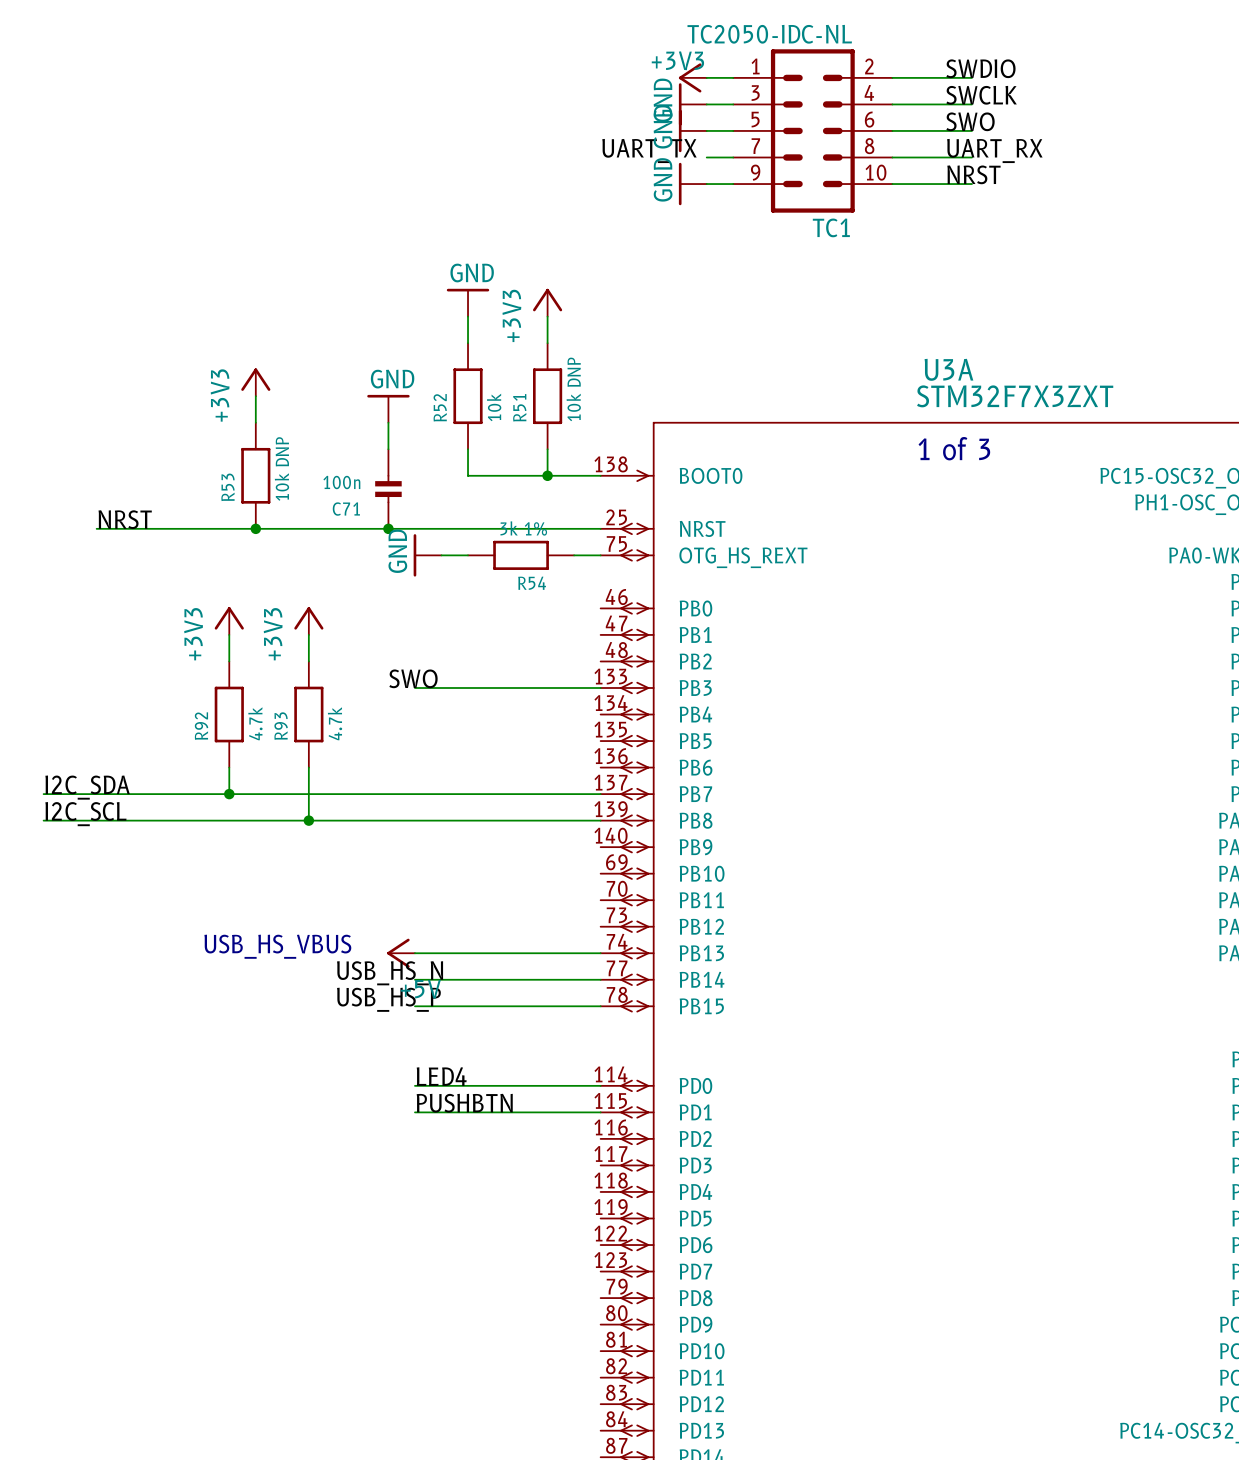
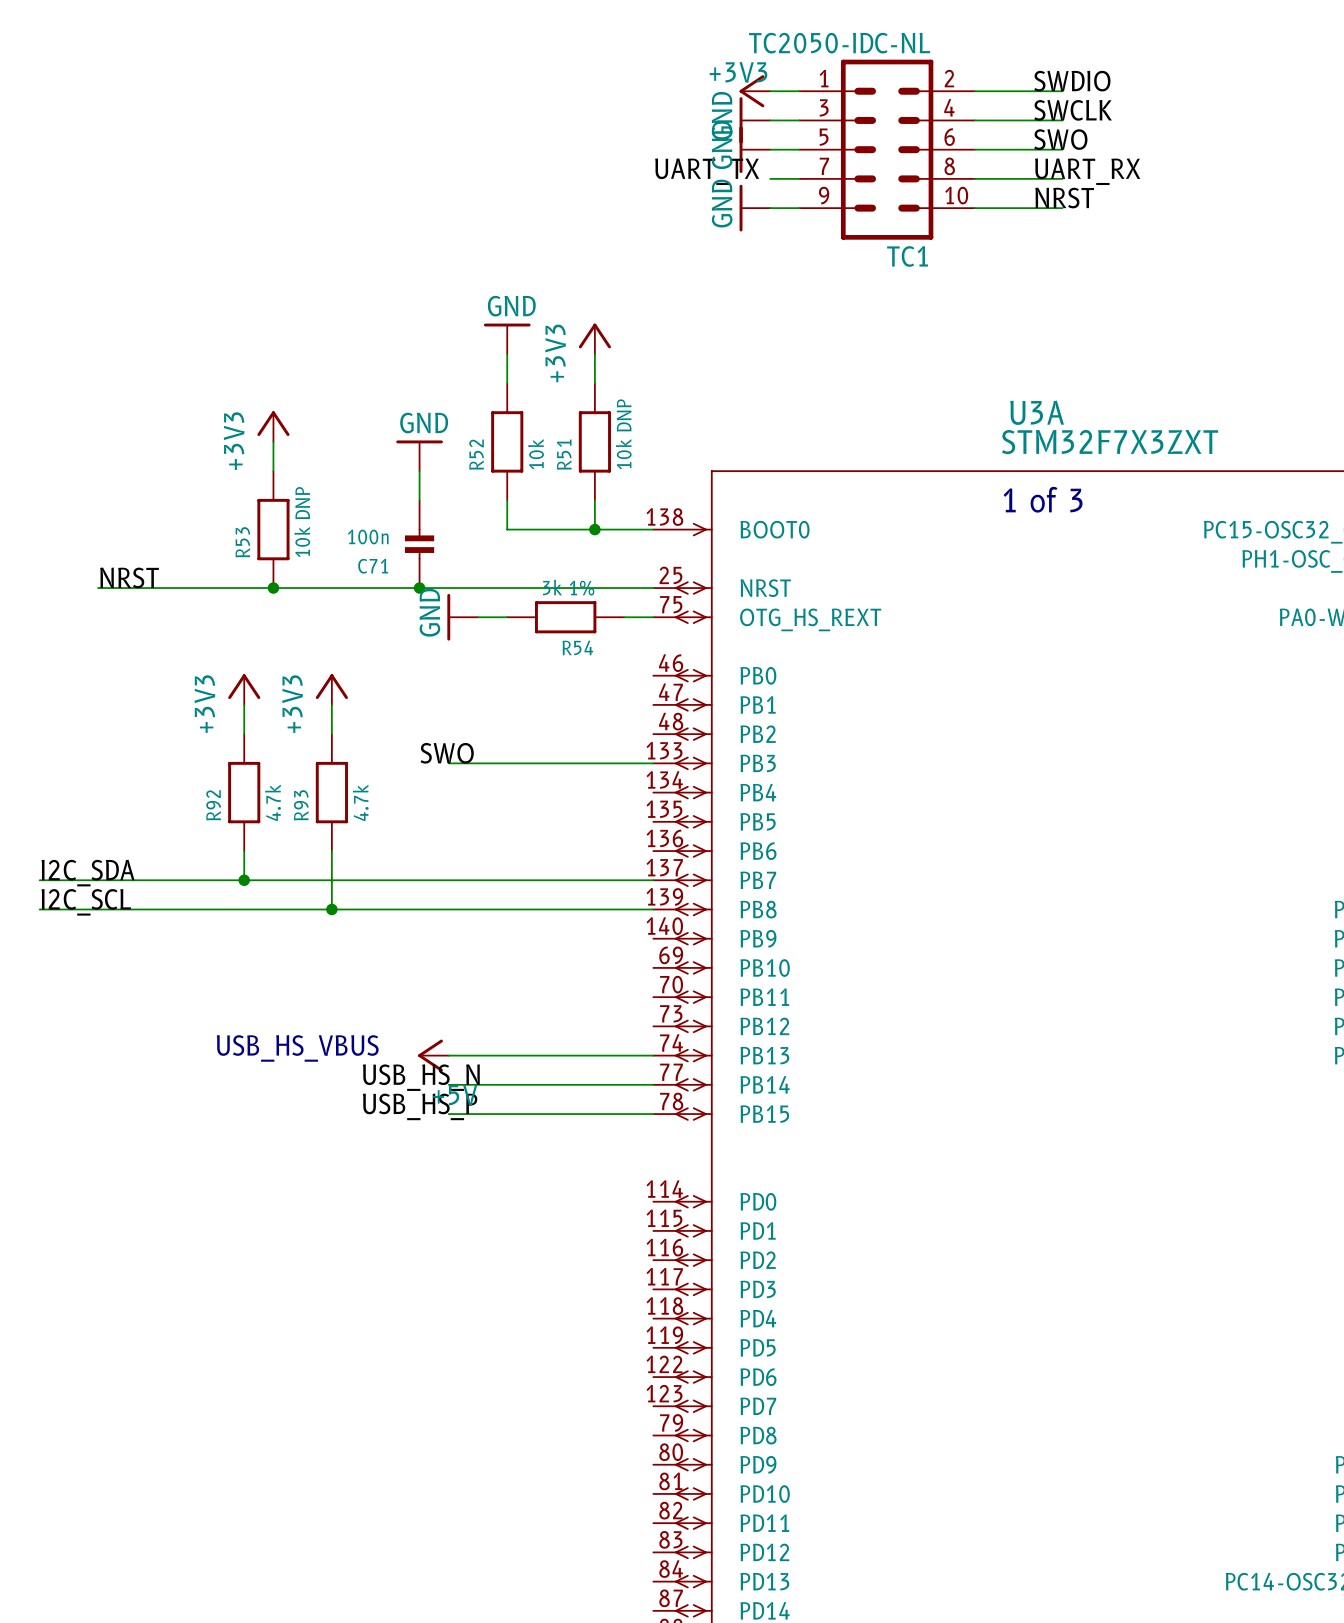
label: LED4 (441, 1076) -> none
wire: (414, 1085) (600, 1085) -> none
label: PUSHBTN (464, 1103) -> none
wire: (414, 1112) (600, 1112) -> none

